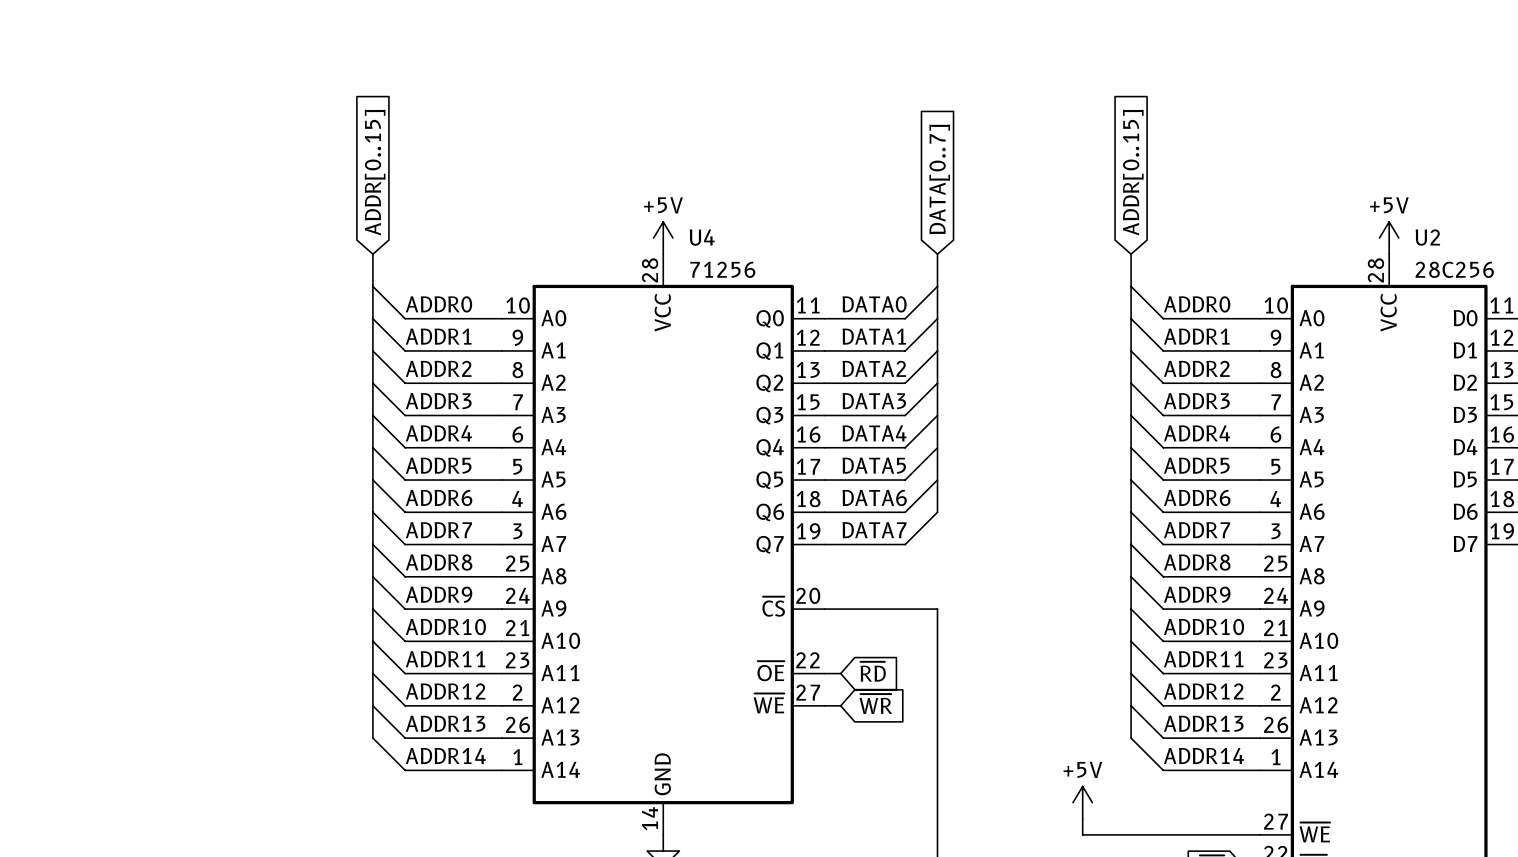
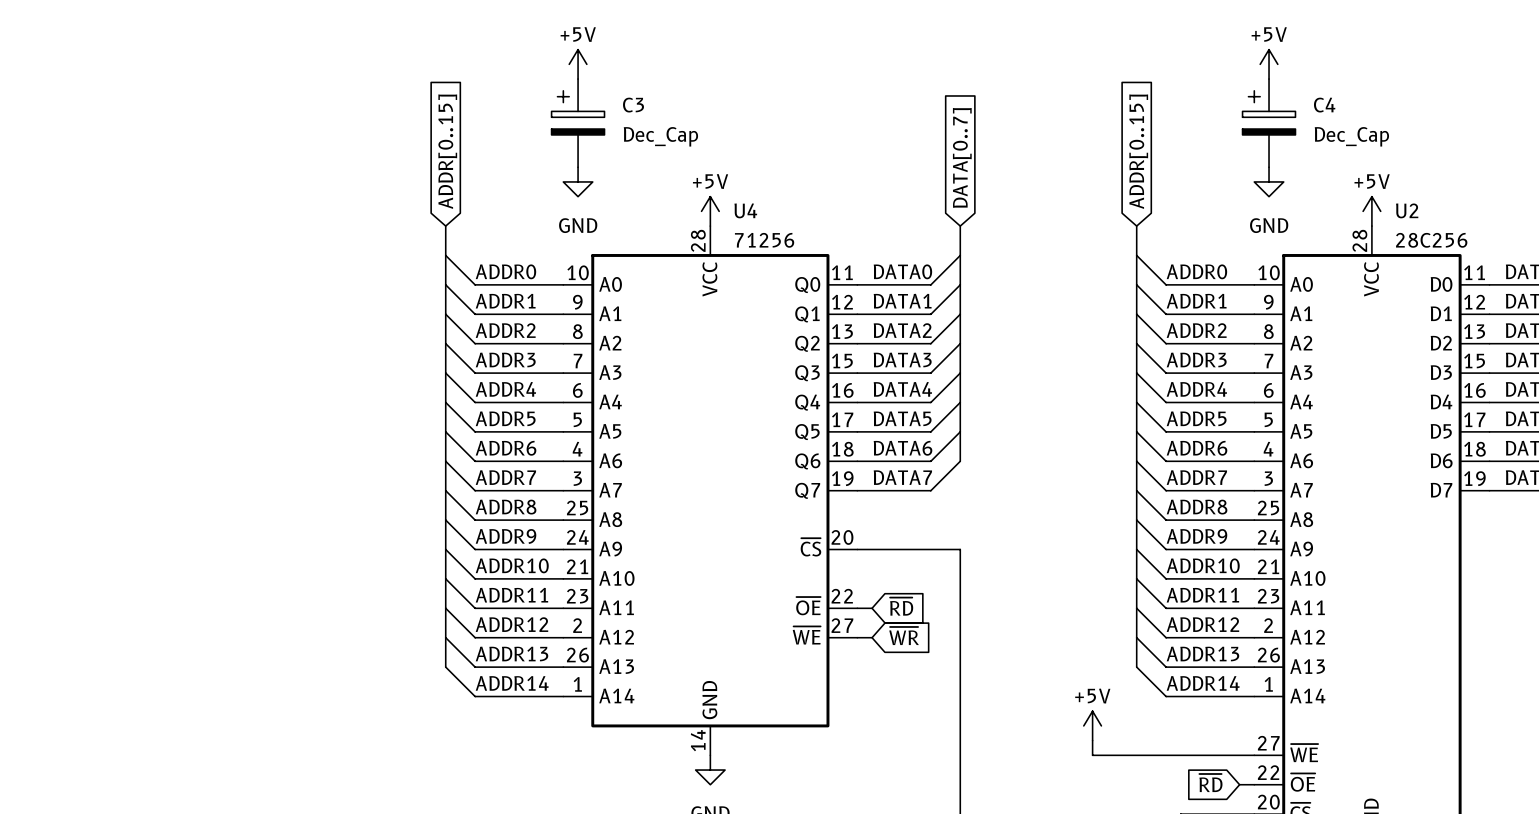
power symbol: none -> +5V (578, 64)
power symbol: none -> +5V (1269, 64)
C3: none -> Dec_Cap (578, 123)
C4: none -> Dec_Cap (1269, 123)
power symbol: none -> GND (578, 181)
power symbol: none -> GND (1269, 181)

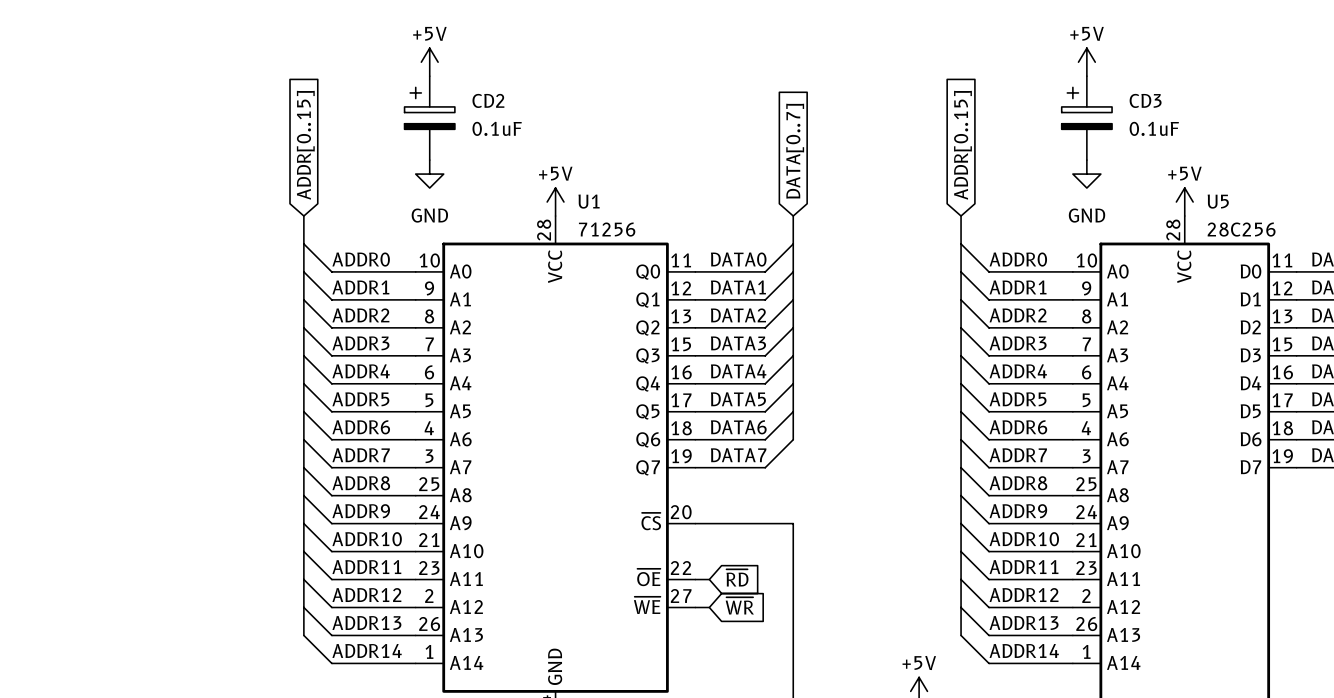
C3 name: C3 (633, 105) -> CD2 (488, 100)
C4 name: C4 (1324, 105) -> CD3 (1145, 100)
C3 value: Dec_Cap (660, 136) -> 0.1uF (497, 128)
C4 value: Dec_Cap (1351, 136) -> 0.1uF (1154, 128)
U4 name: U4 (745, 210) -> U1 (589, 201)
U2 name: U2 (1407, 210) -> U5 (1218, 201)

